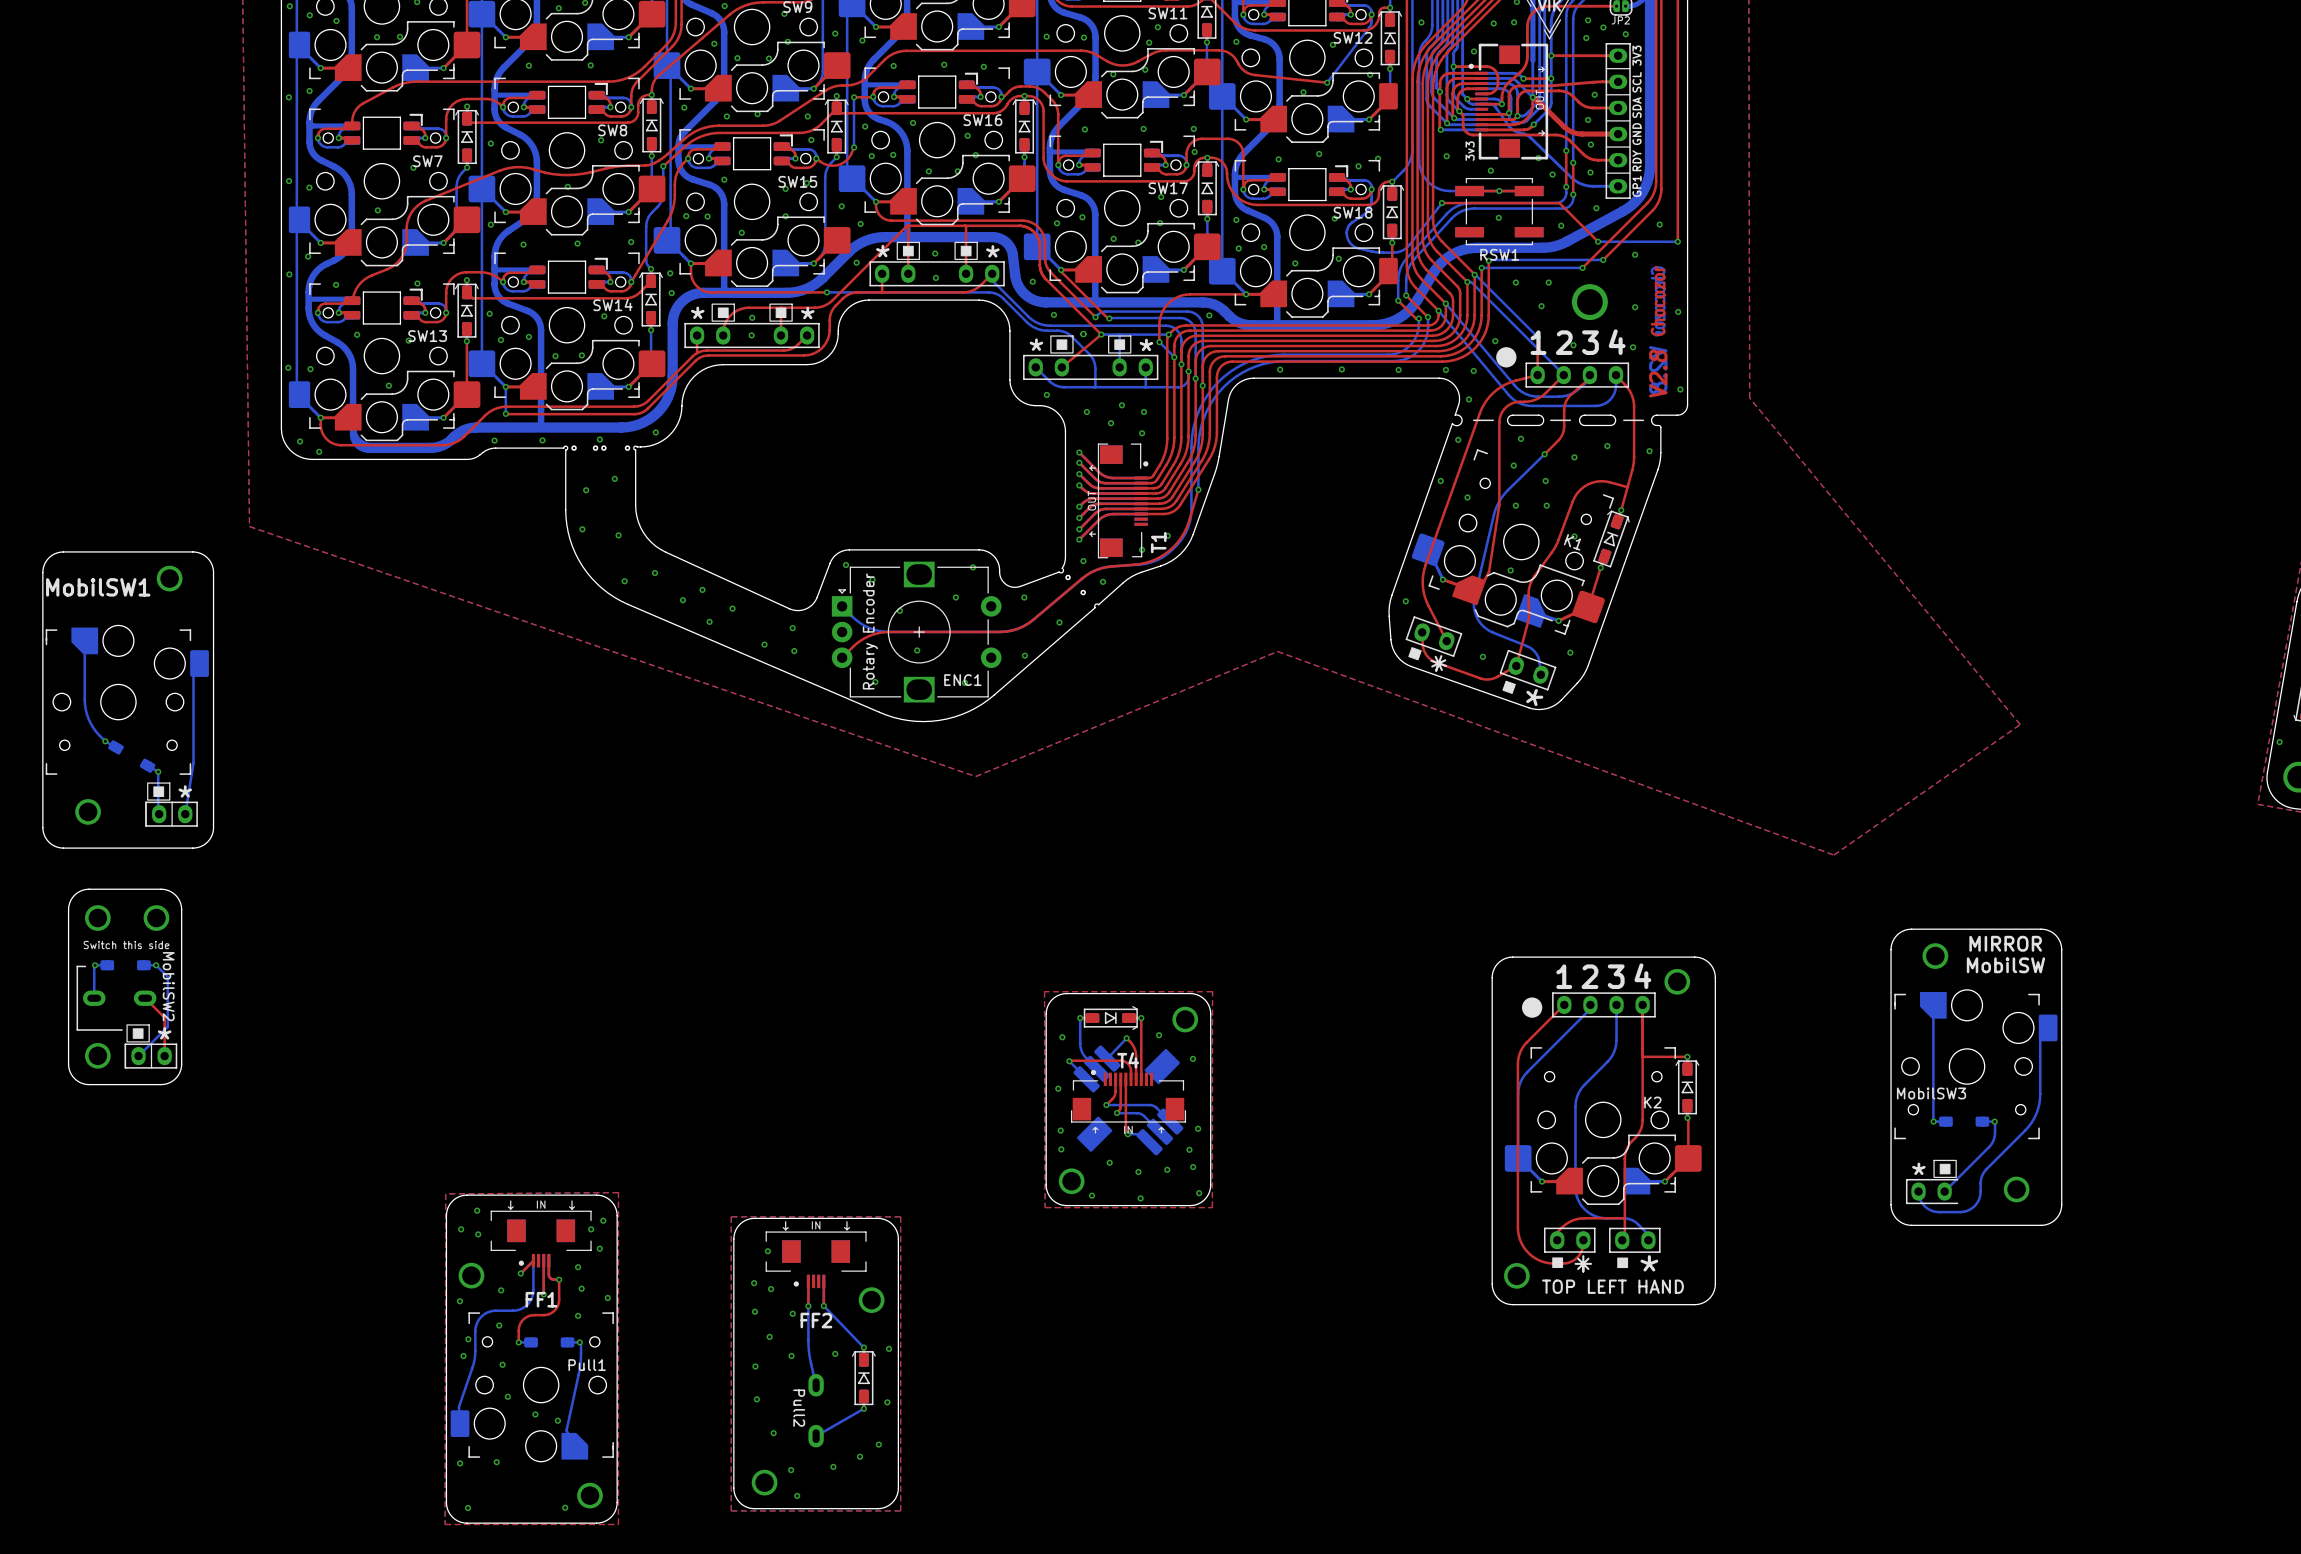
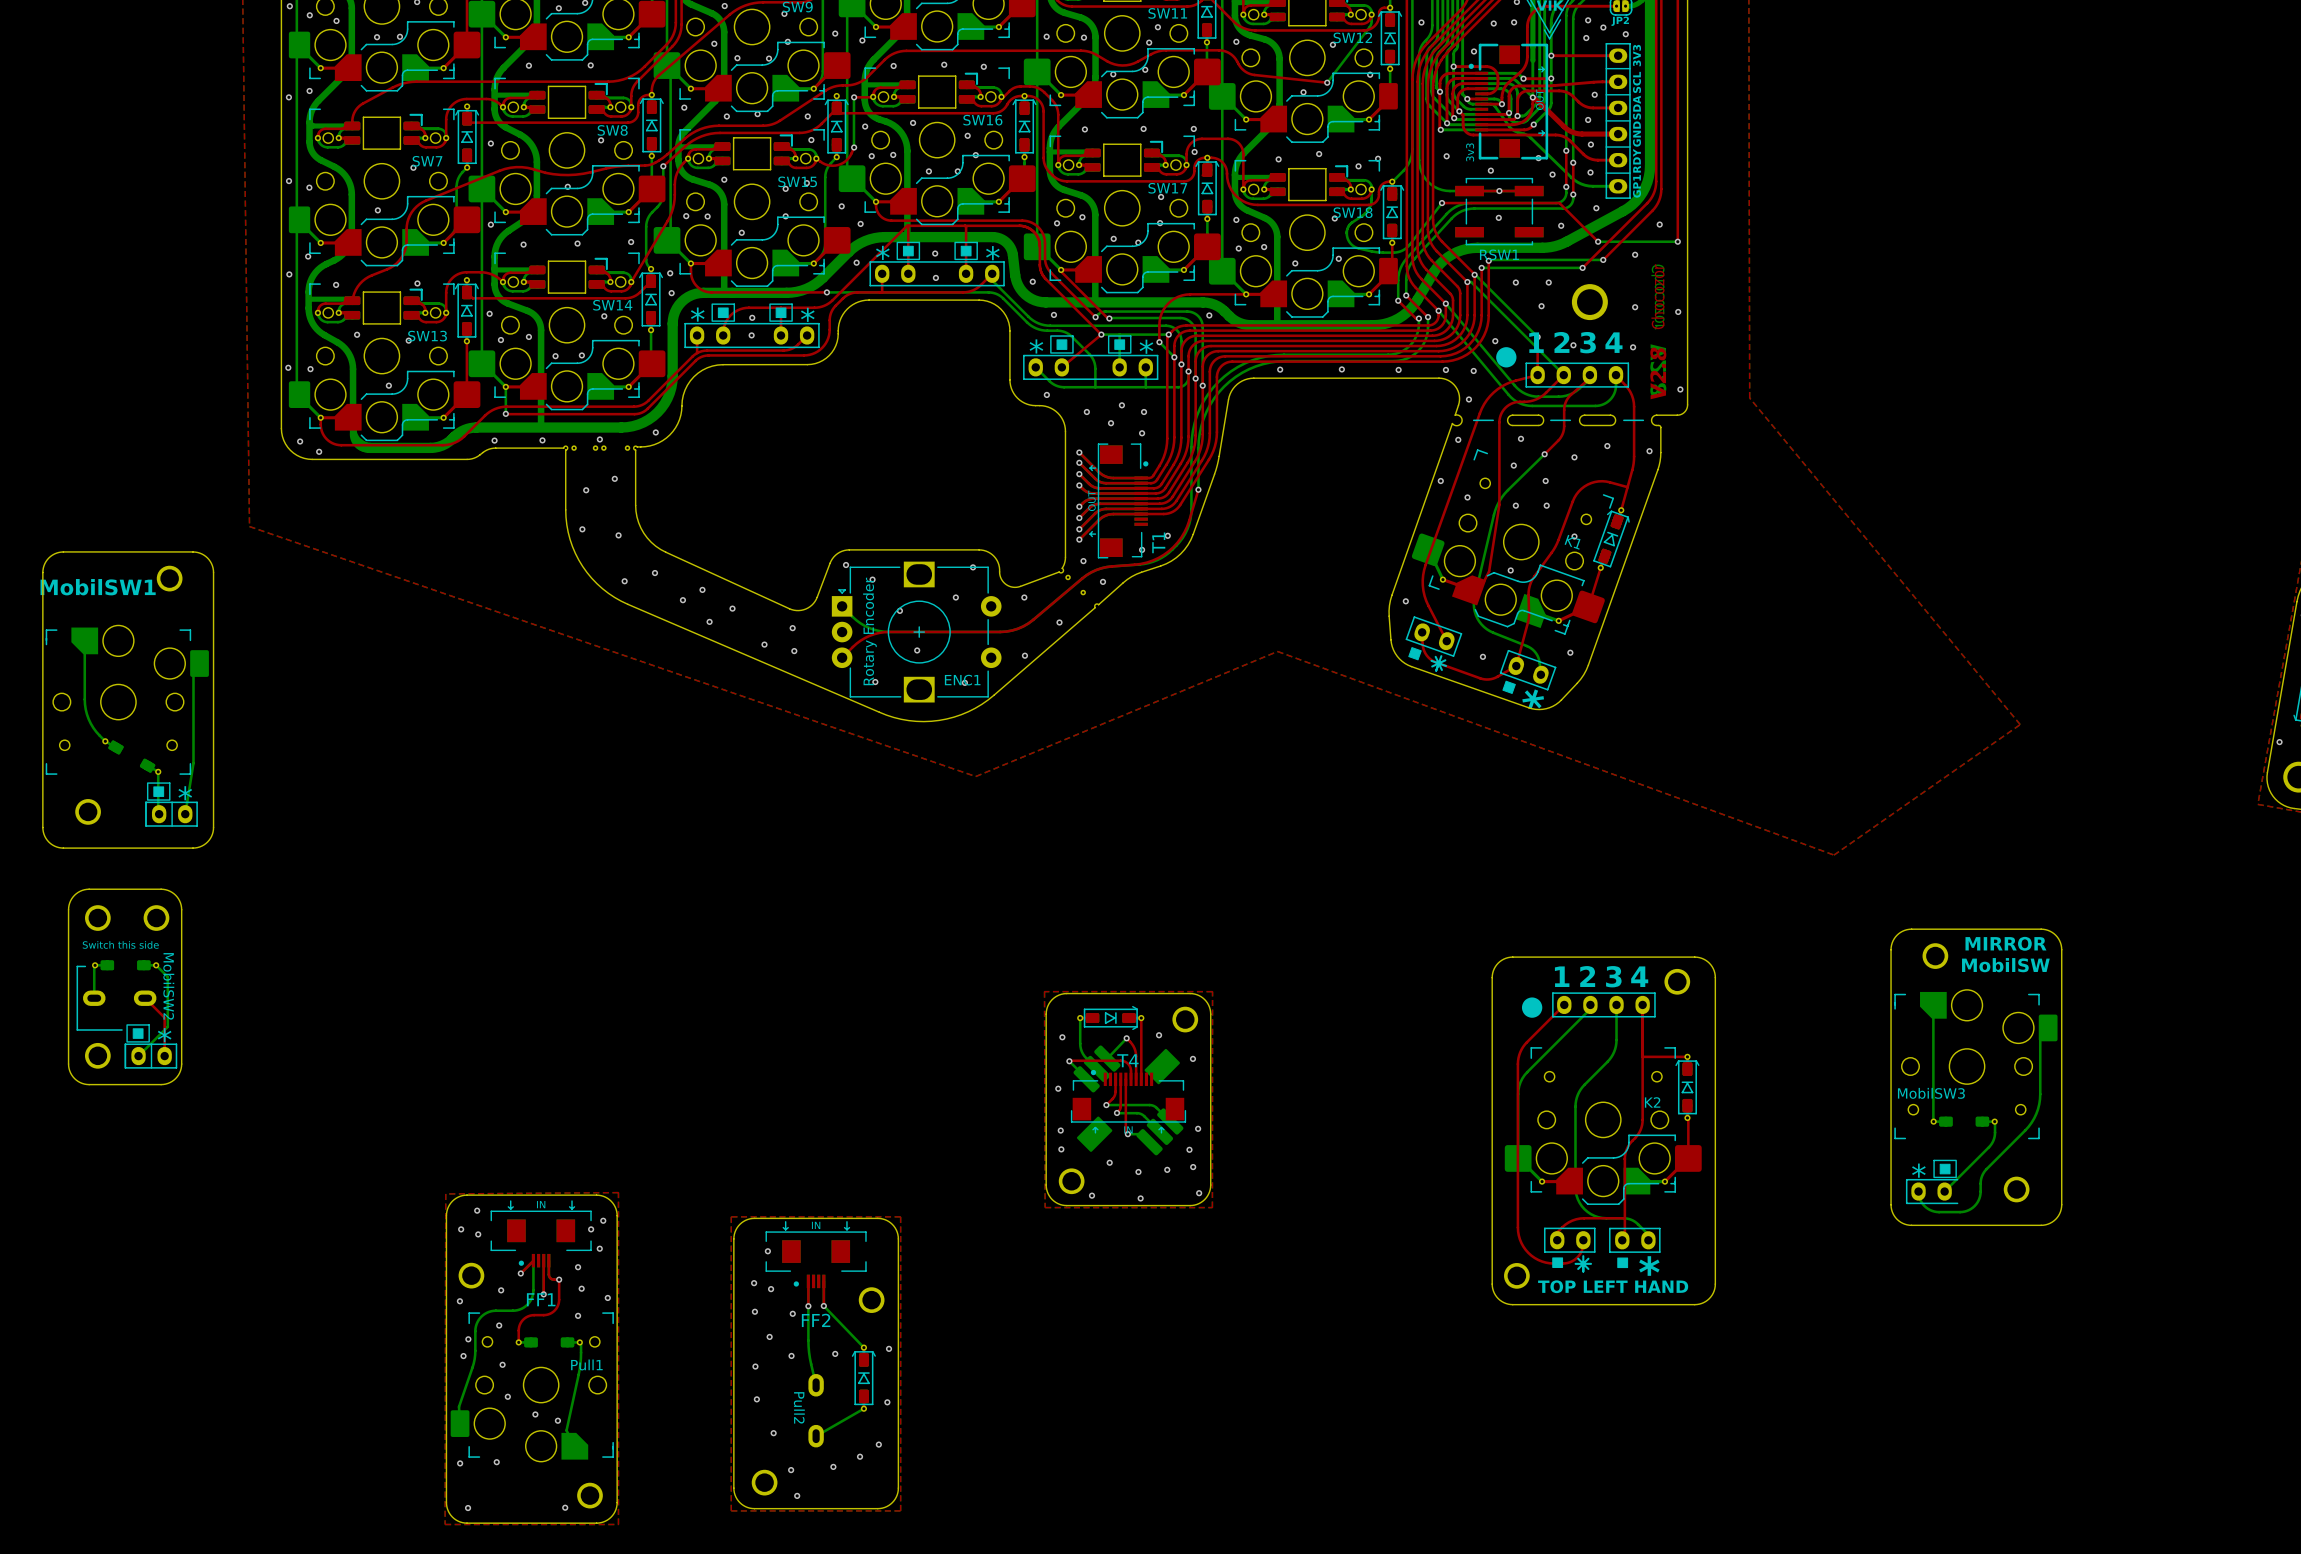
via: (1083, 334) -> none

